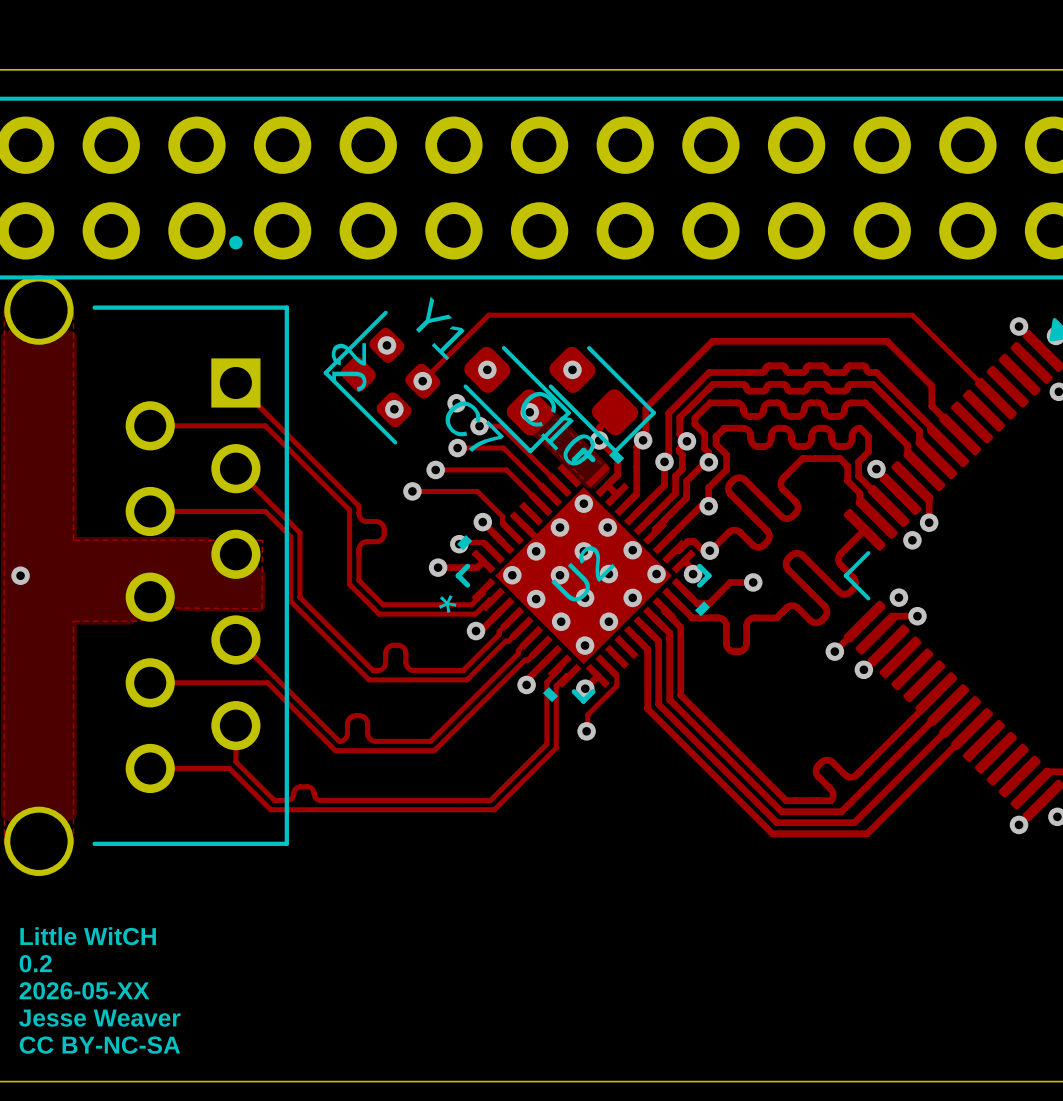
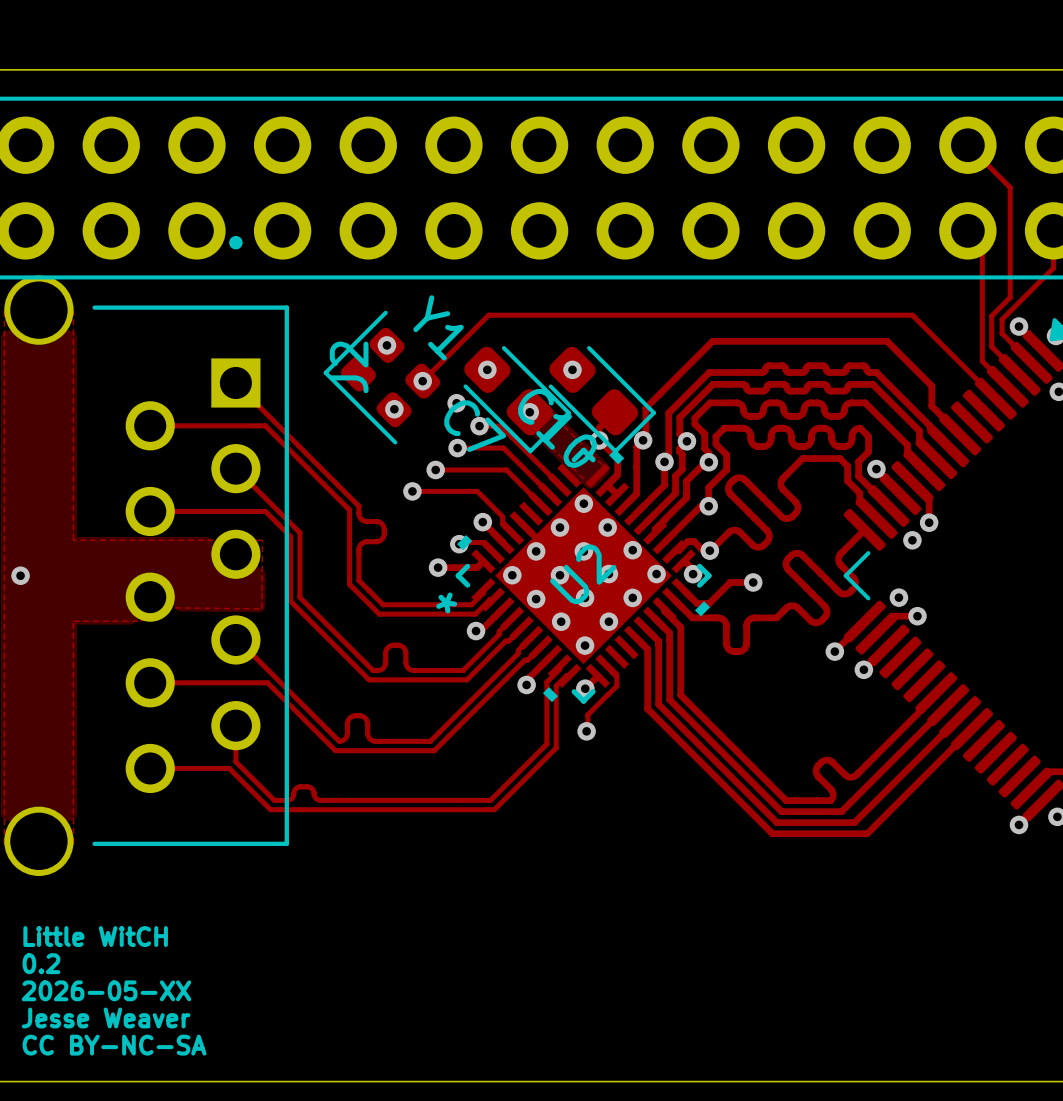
track: none -> (967, 145) (1010, 187) (1010, 297) (991, 316) (991, 346) (1019, 374)
track: none -> (967, 230) (982, 245) (982, 361) (1007, 386)
track: none -> (1053, 230) (1053, 268) (1002, 319) (1002, 333) (1031, 362)

